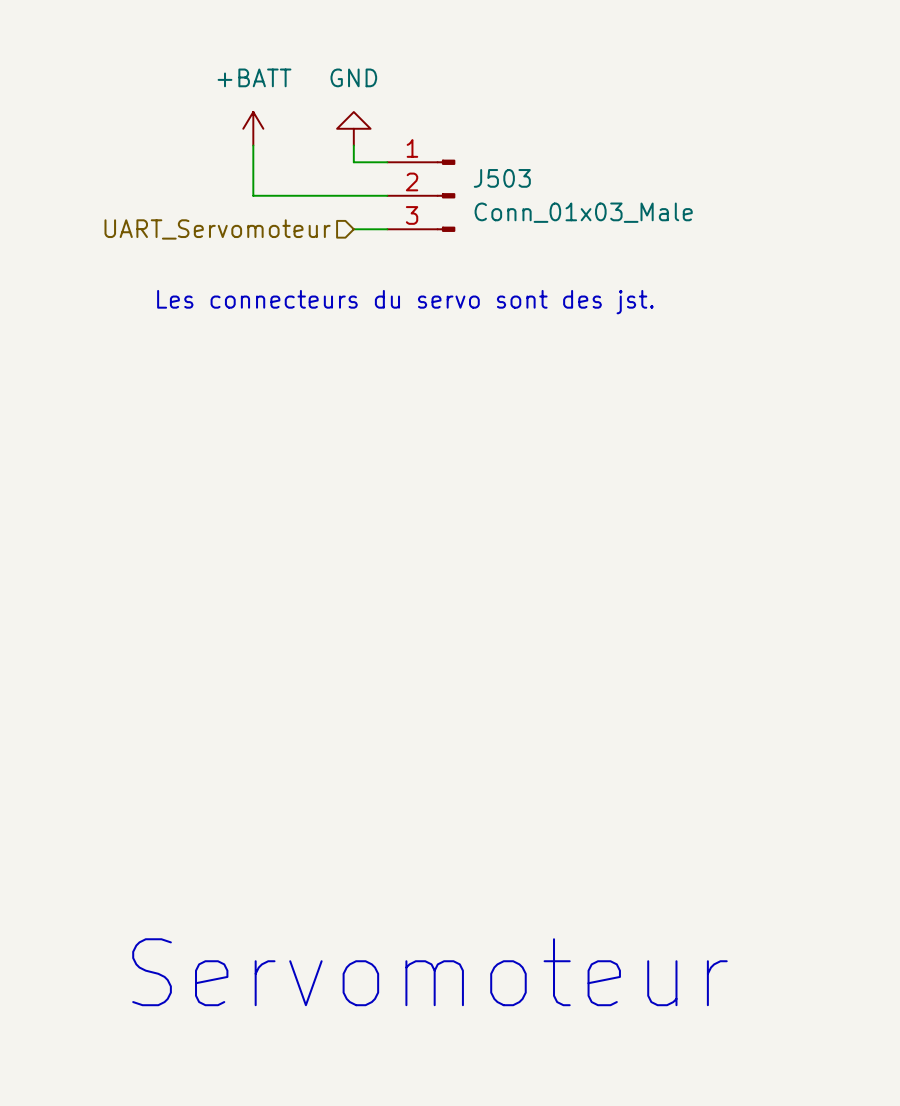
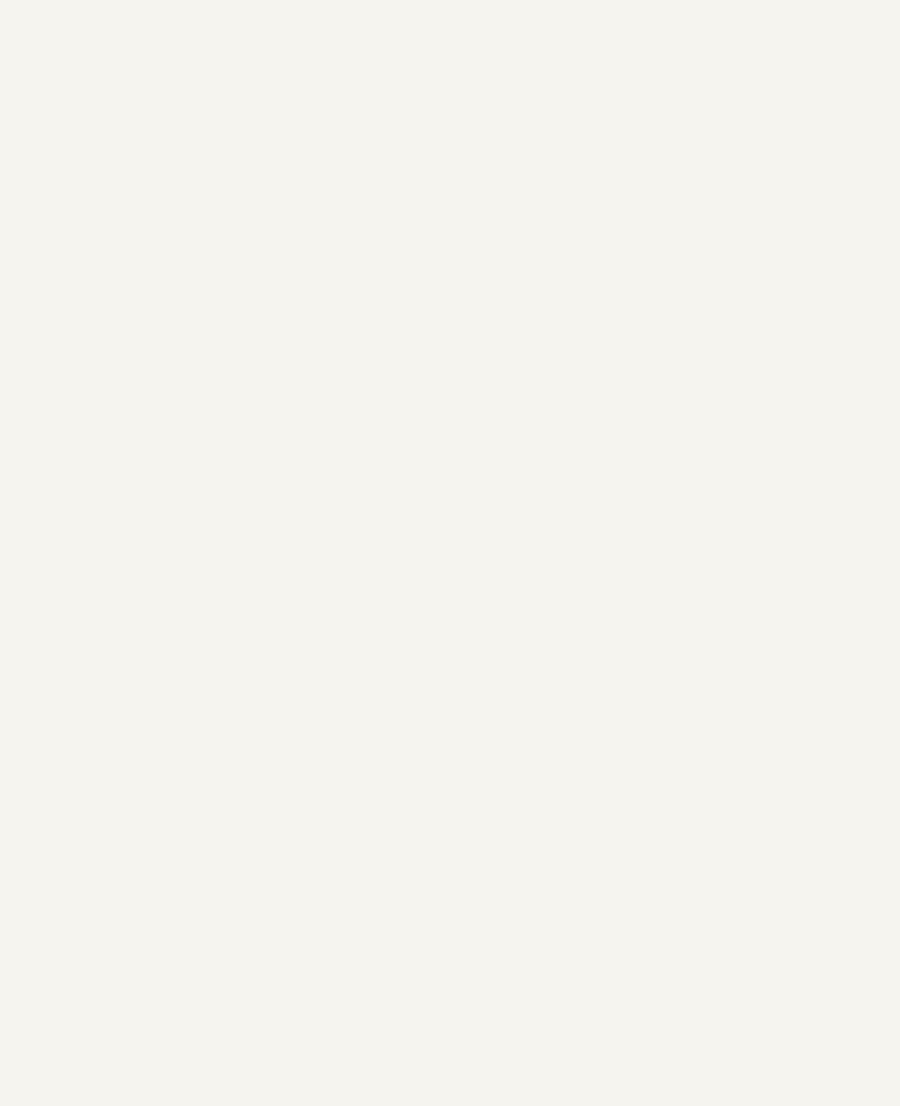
power symbol: +BATT (253, 128) -> none
power symbol: GND (353, 128) -> none
wire: (253, 145) (253, 195) (387, 195) -> none
wire: (353, 145) (353, 162) (387, 162) -> none
J503: Conn_01x03_Male (421, 195) -> none
hierarchical label: UART_Servomoteur (217, 229) -> none
wire: (353, 229) (387, 229) -> none
text: Les connecteurs du servo sont des jst. (405, 302) -> none
text: Servomoteur (429, 972) -> none

